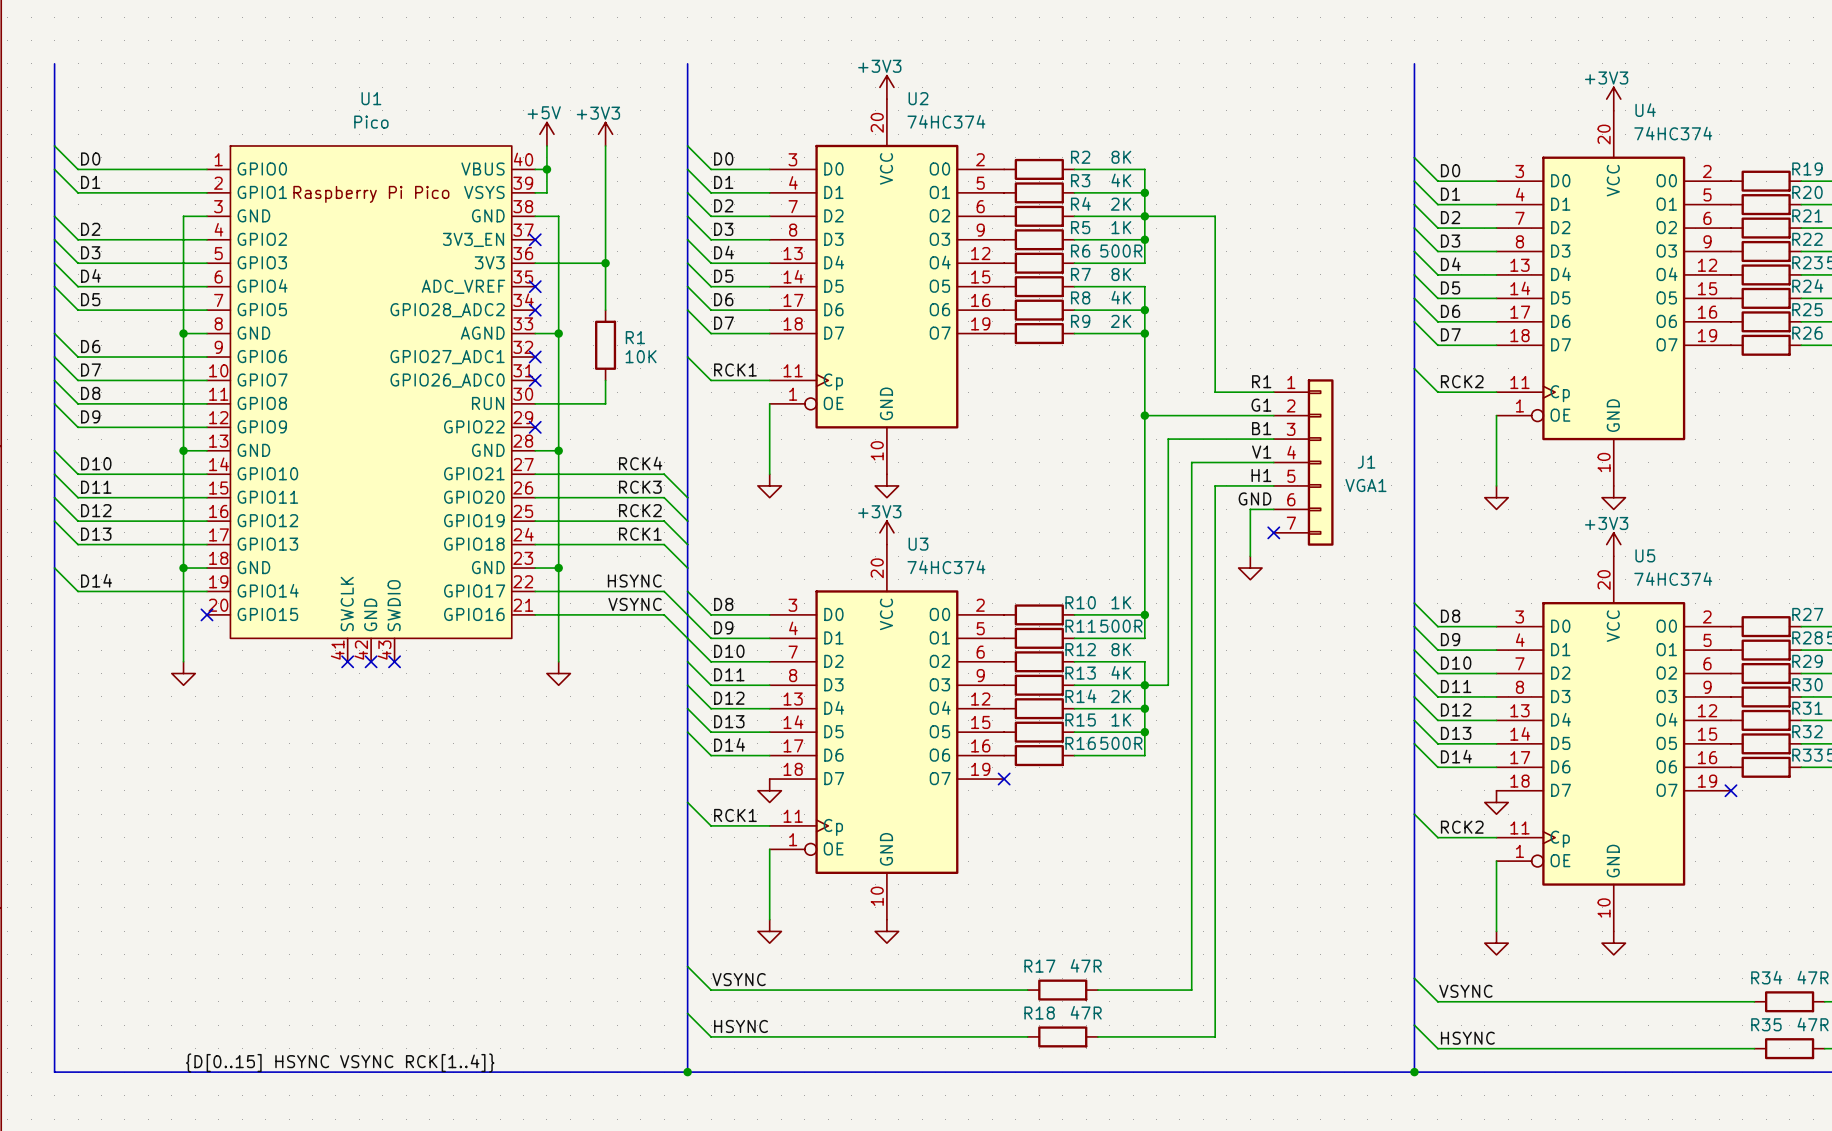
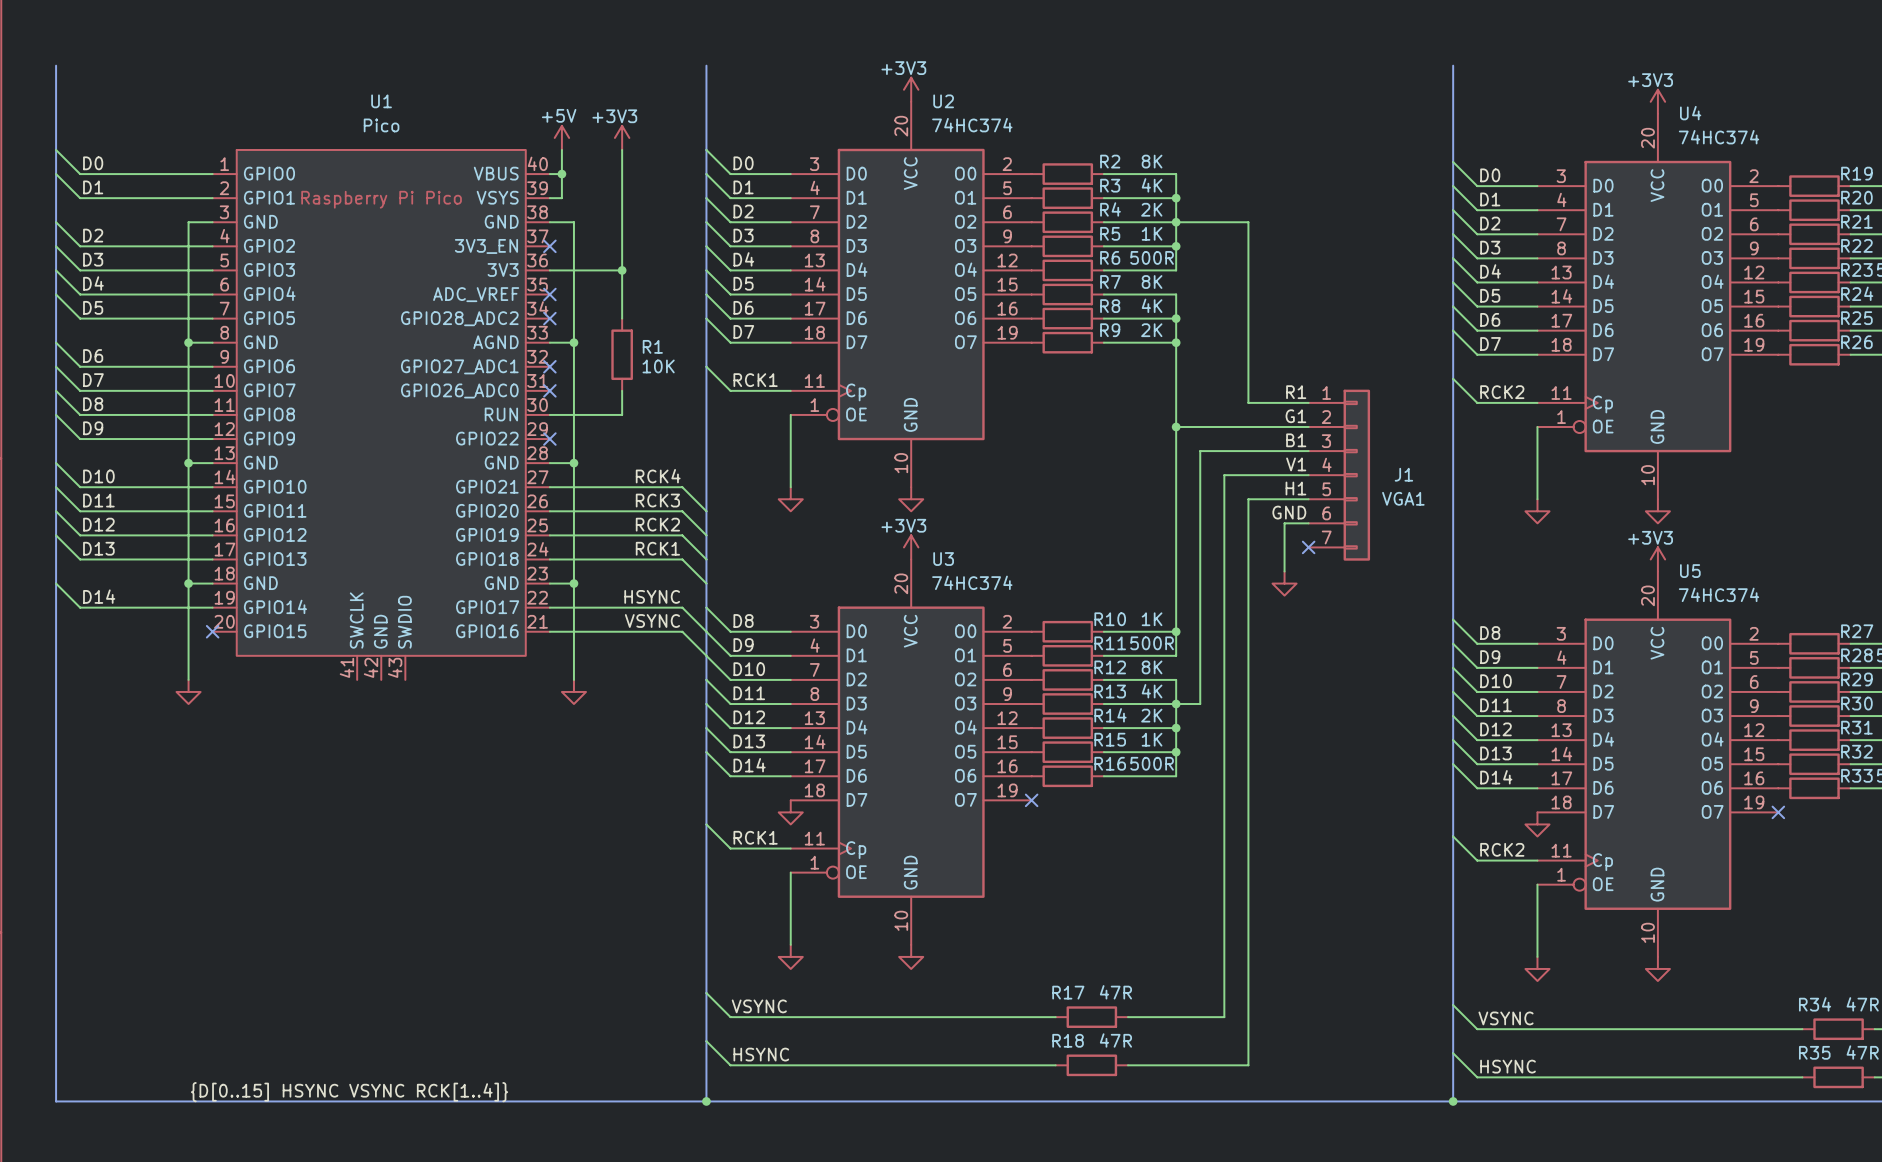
no-connect mark: (347, 661) -> none
no-connect mark: (371, 661) -> none
no-connect mark: (394, 661) -> none

